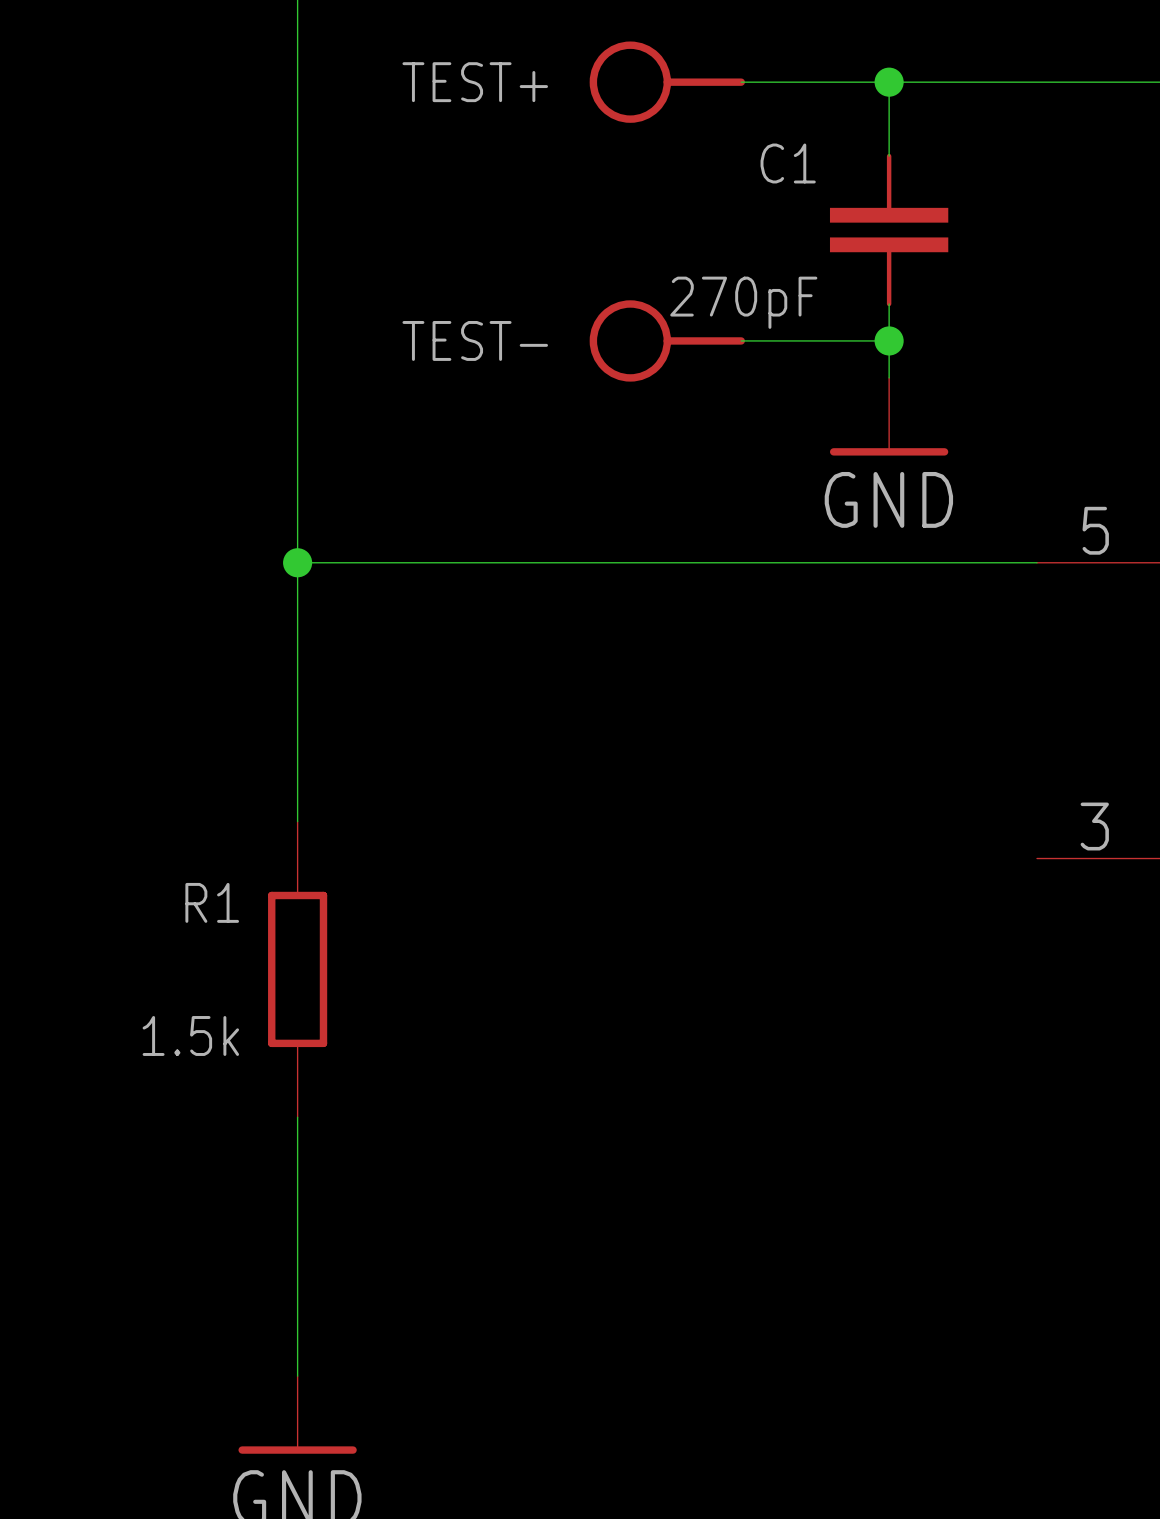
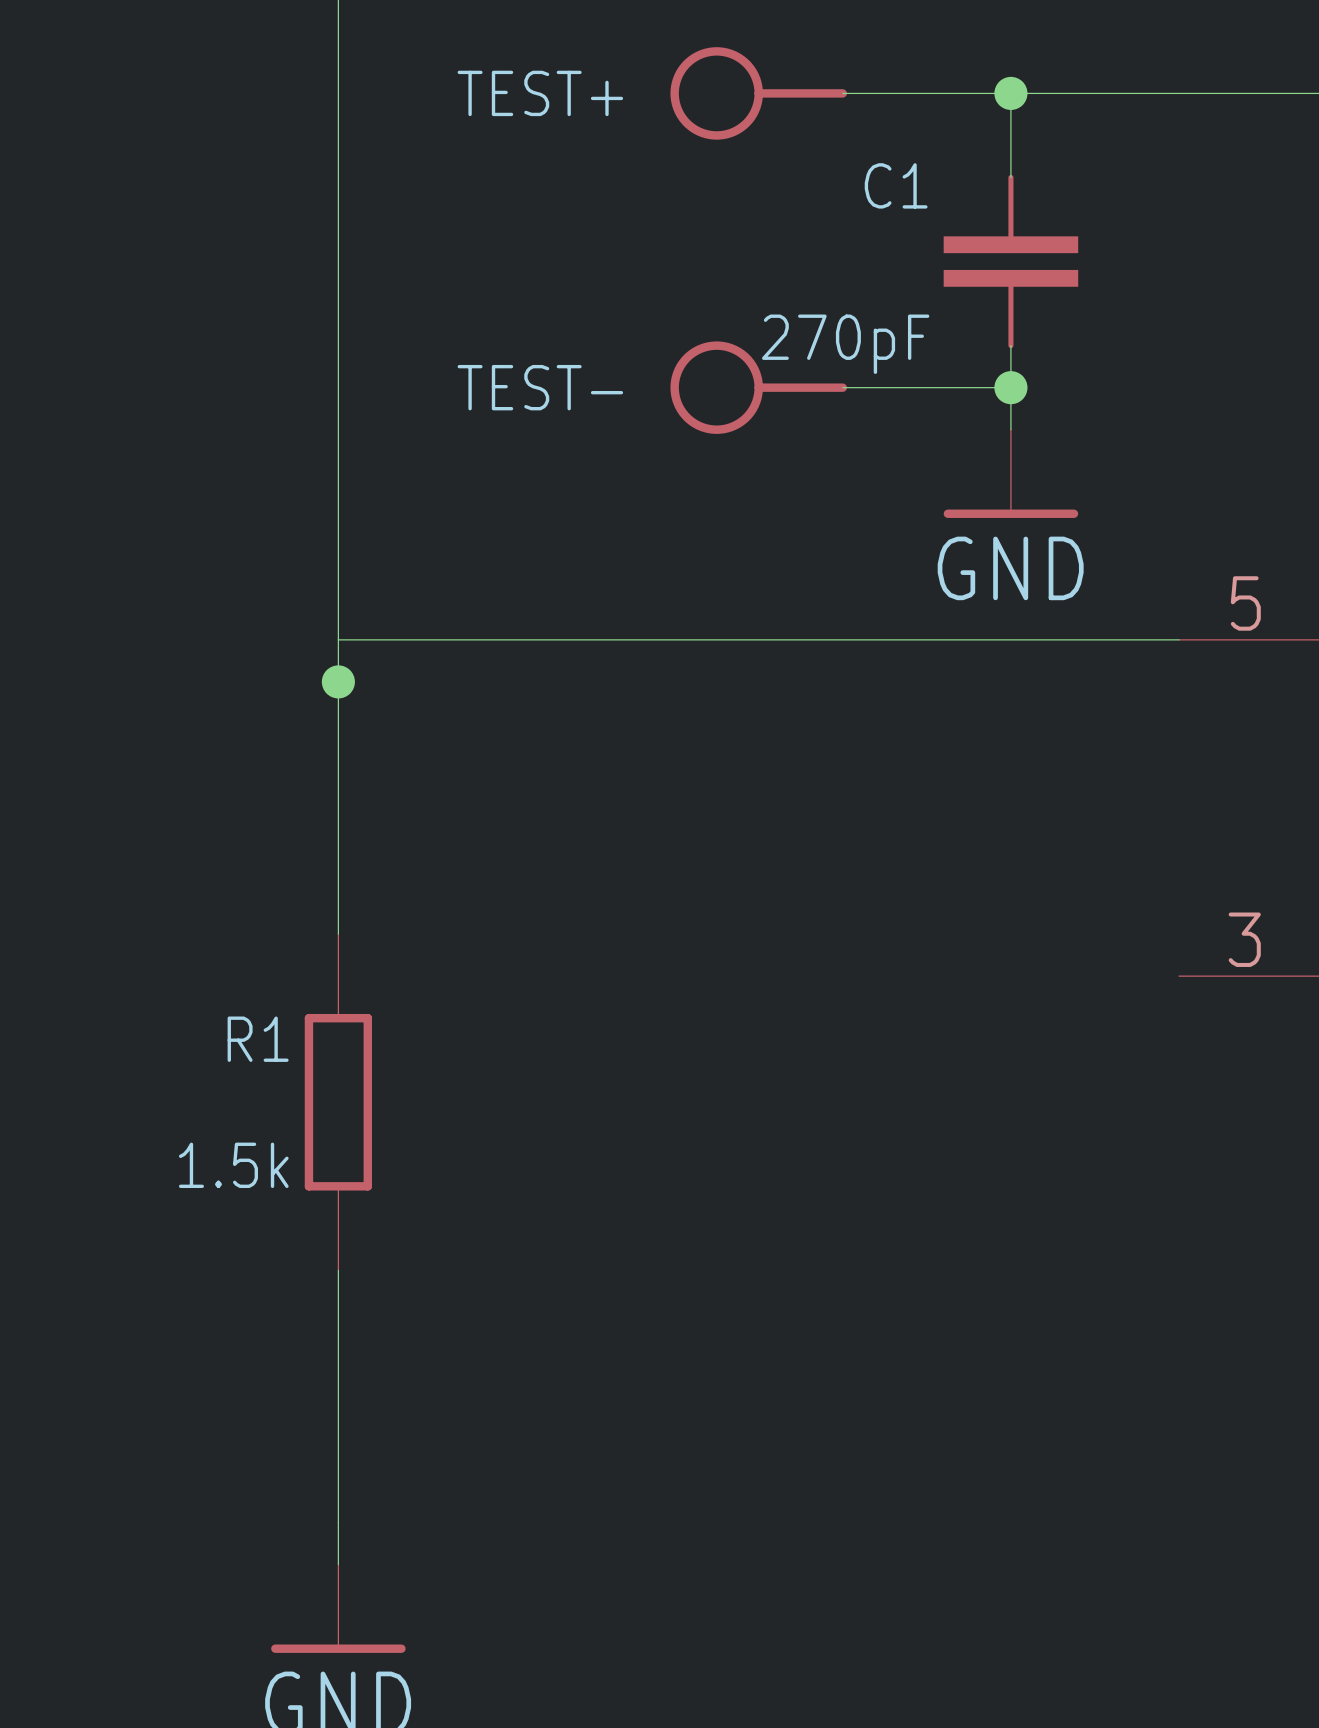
junction position: (297, 562) -> (338, 681)
R1 name position: R1 (212, 902) -> R1 (258, 1039)
R1 value position: 1.5k (190, 1035) -> 1.5k (233, 1165)

